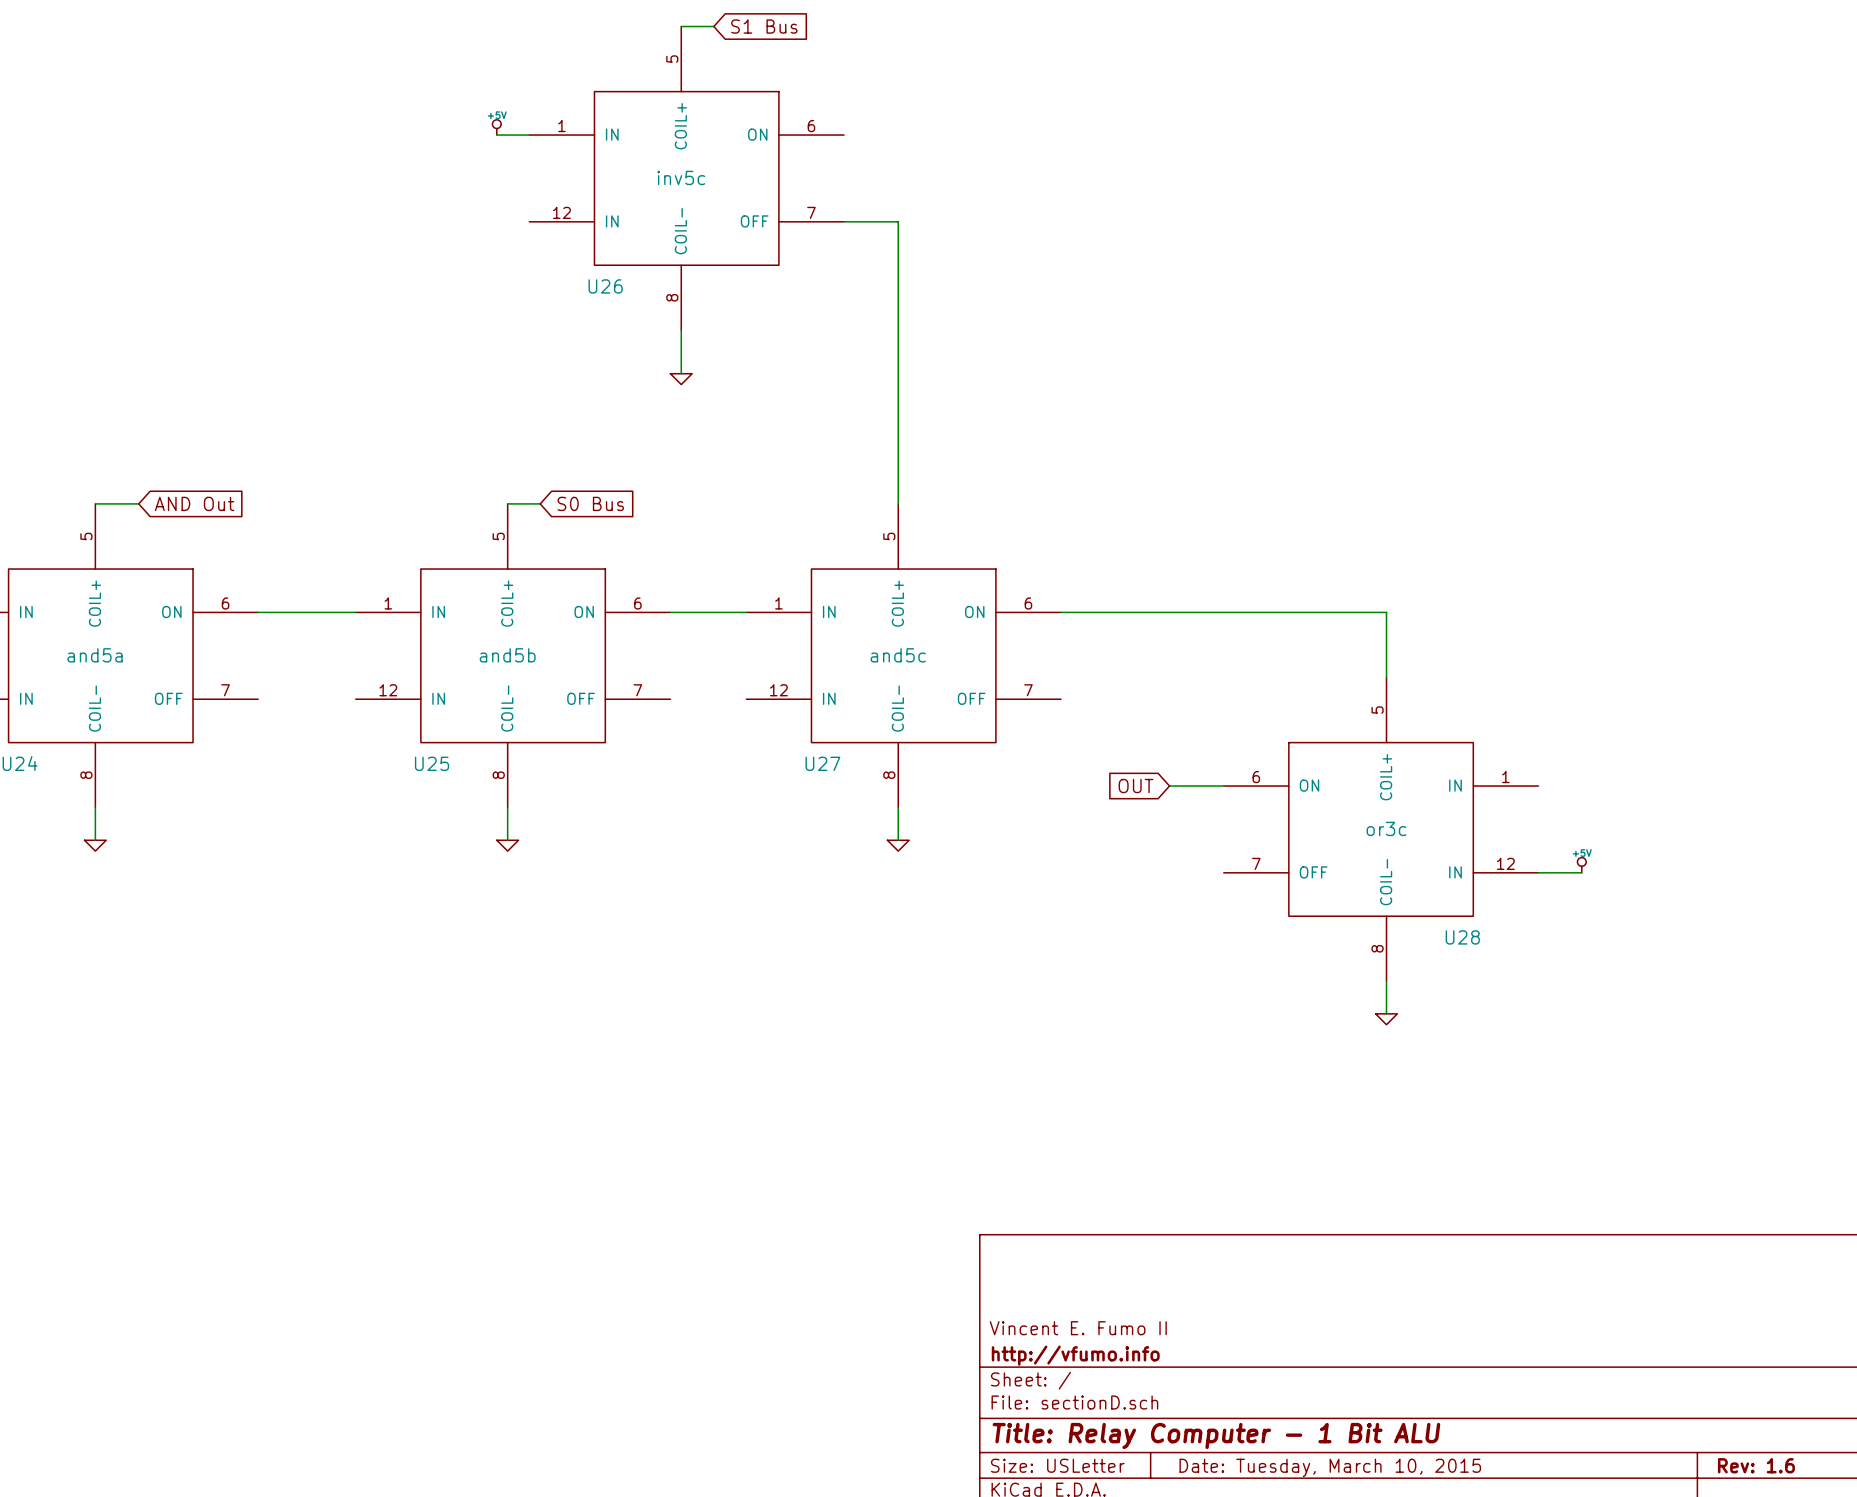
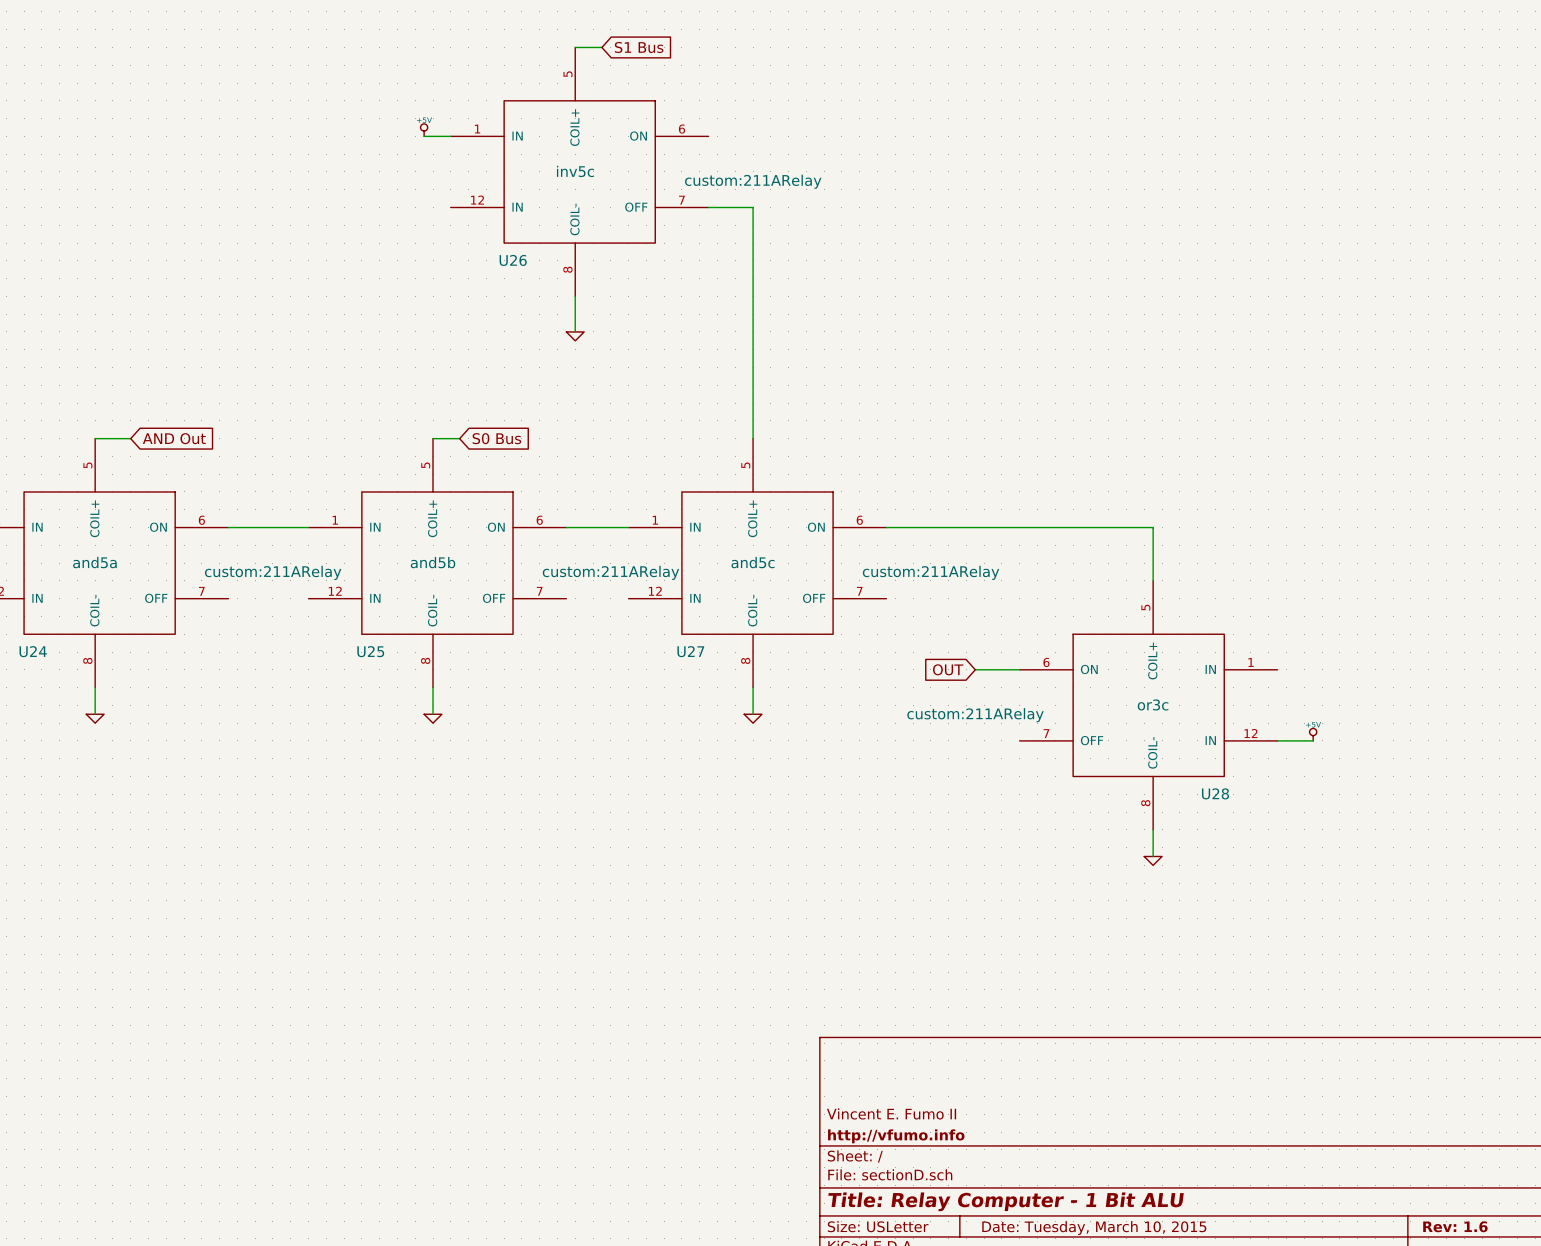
U26 text: none -> custom:211ARelay (753, 181)
U24 text: none -> custom:211ARelay (273, 572)
U25 text: none -> custom:211ARelay (610, 572)
U27 text: none -> custom:211ARelay (931, 572)
U28 text: none -> custom:211ARelay (975, 715)

